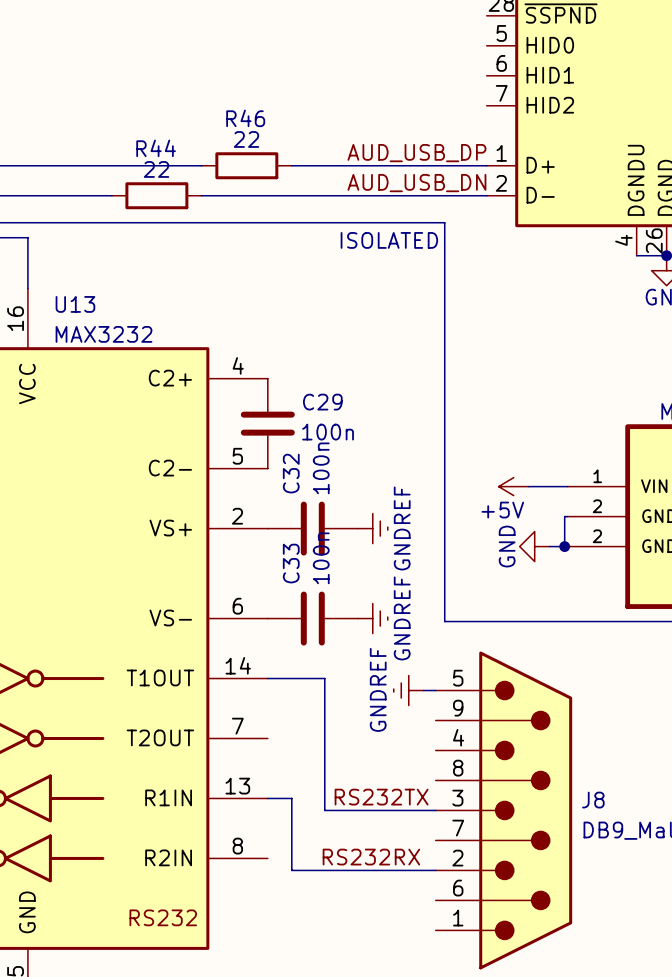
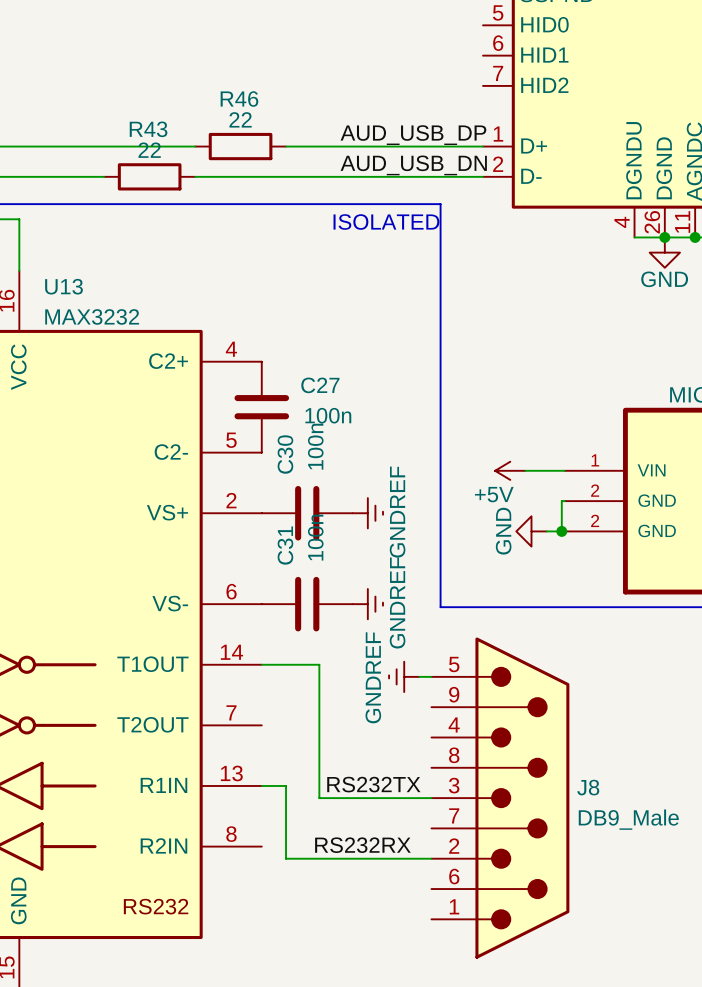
R44 name: R44 (156, 148) -> R43 (148, 129)
C29 name: C29 (322, 402) -> C27 (320, 385)
C32 name: C32 (291, 473) -> C30 (285, 454)
C33 name: C33 (291, 563) -> C31 (285, 545)

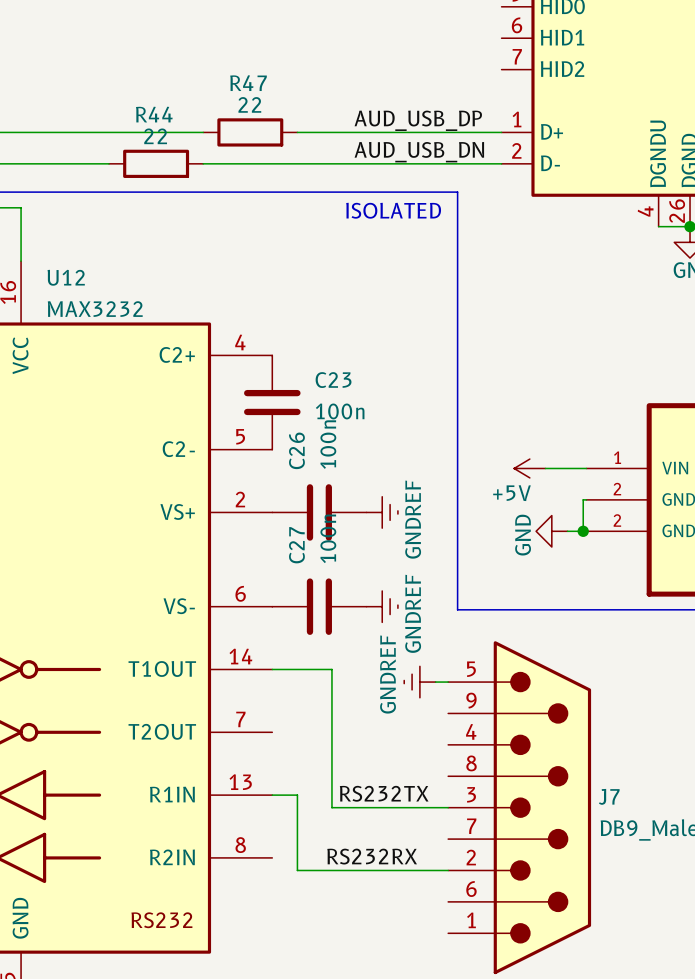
R46 name: R46 (239, 99) -> R47 (248, 83)
R43 name: R43 (148, 129) -> R44 (154, 114)
U13 name: U13 (64, 286) -> U12 (66, 277)
C27 name: C27 (320, 385) -> C23 (333, 380)
C30 name: C30 (285, 454) -> C26 (296, 450)
C31 name: C31 (285, 545) -> C27 (296, 545)
J8 name: J8 (588, 787) -> J7 (609, 796)

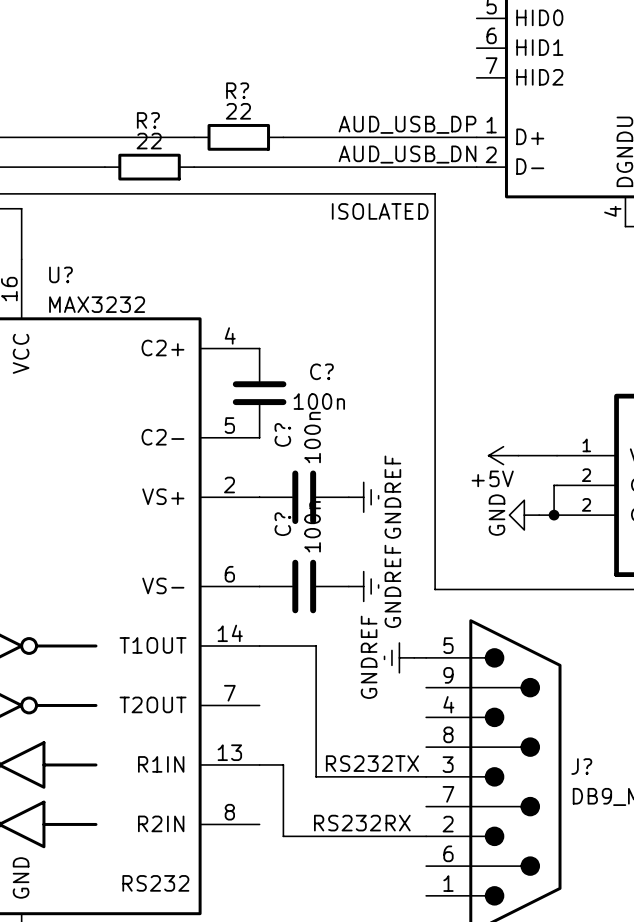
R47 name: R47 (248, 83) -> R? (237, 90)
R44 name: R44 (154, 114) -> R? (148, 120)
U12 name: U12 (66, 277) -> U? (60, 274)
C23 name: C23 (333, 380) -> C? (321, 371)
C26 name: C26 (296, 450) -> C? (282, 434)
C27 name: C27 (296, 545) -> C? (282, 524)
J7 name: J7 (609, 796) -> J? (581, 766)

